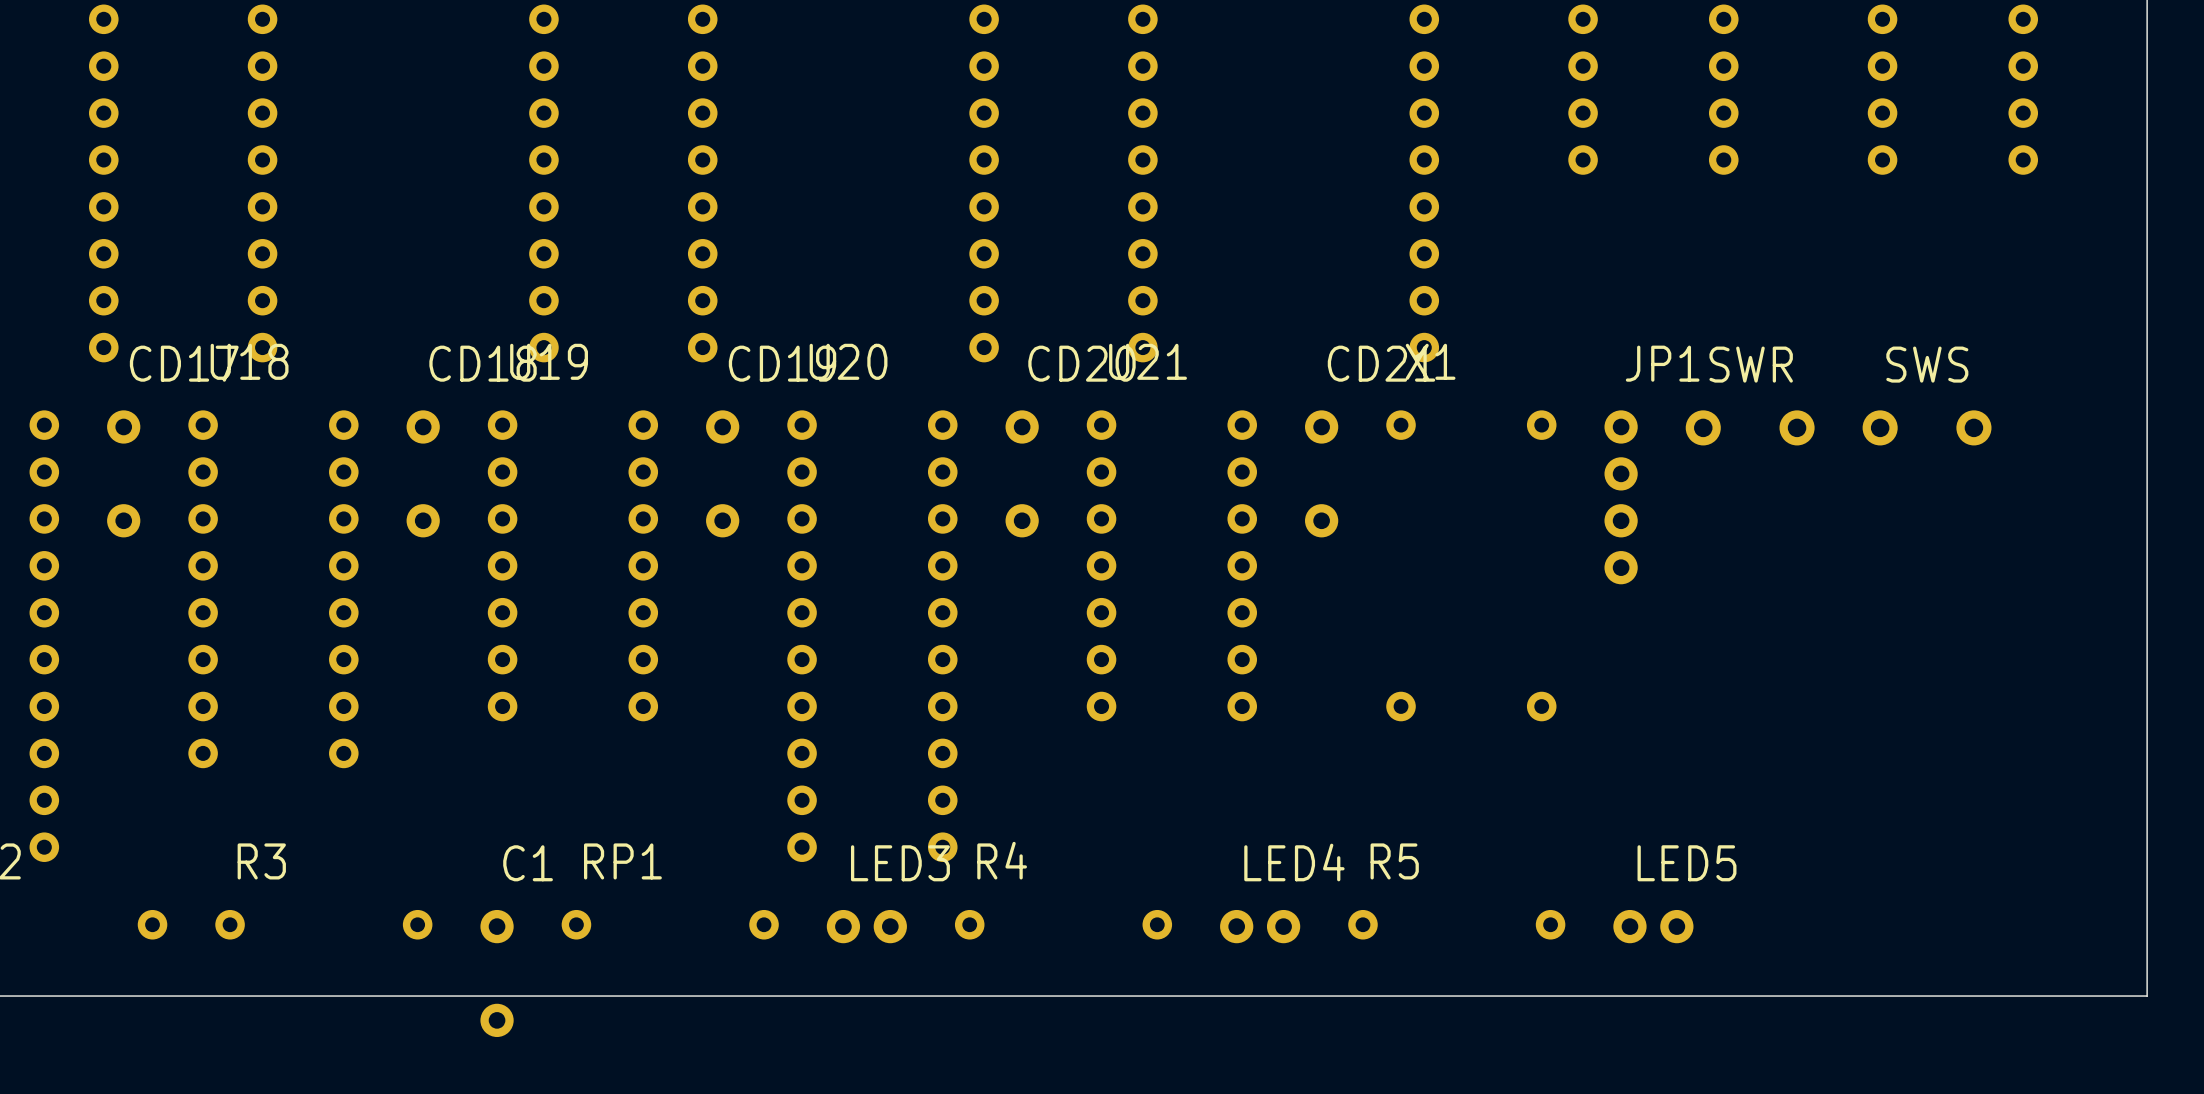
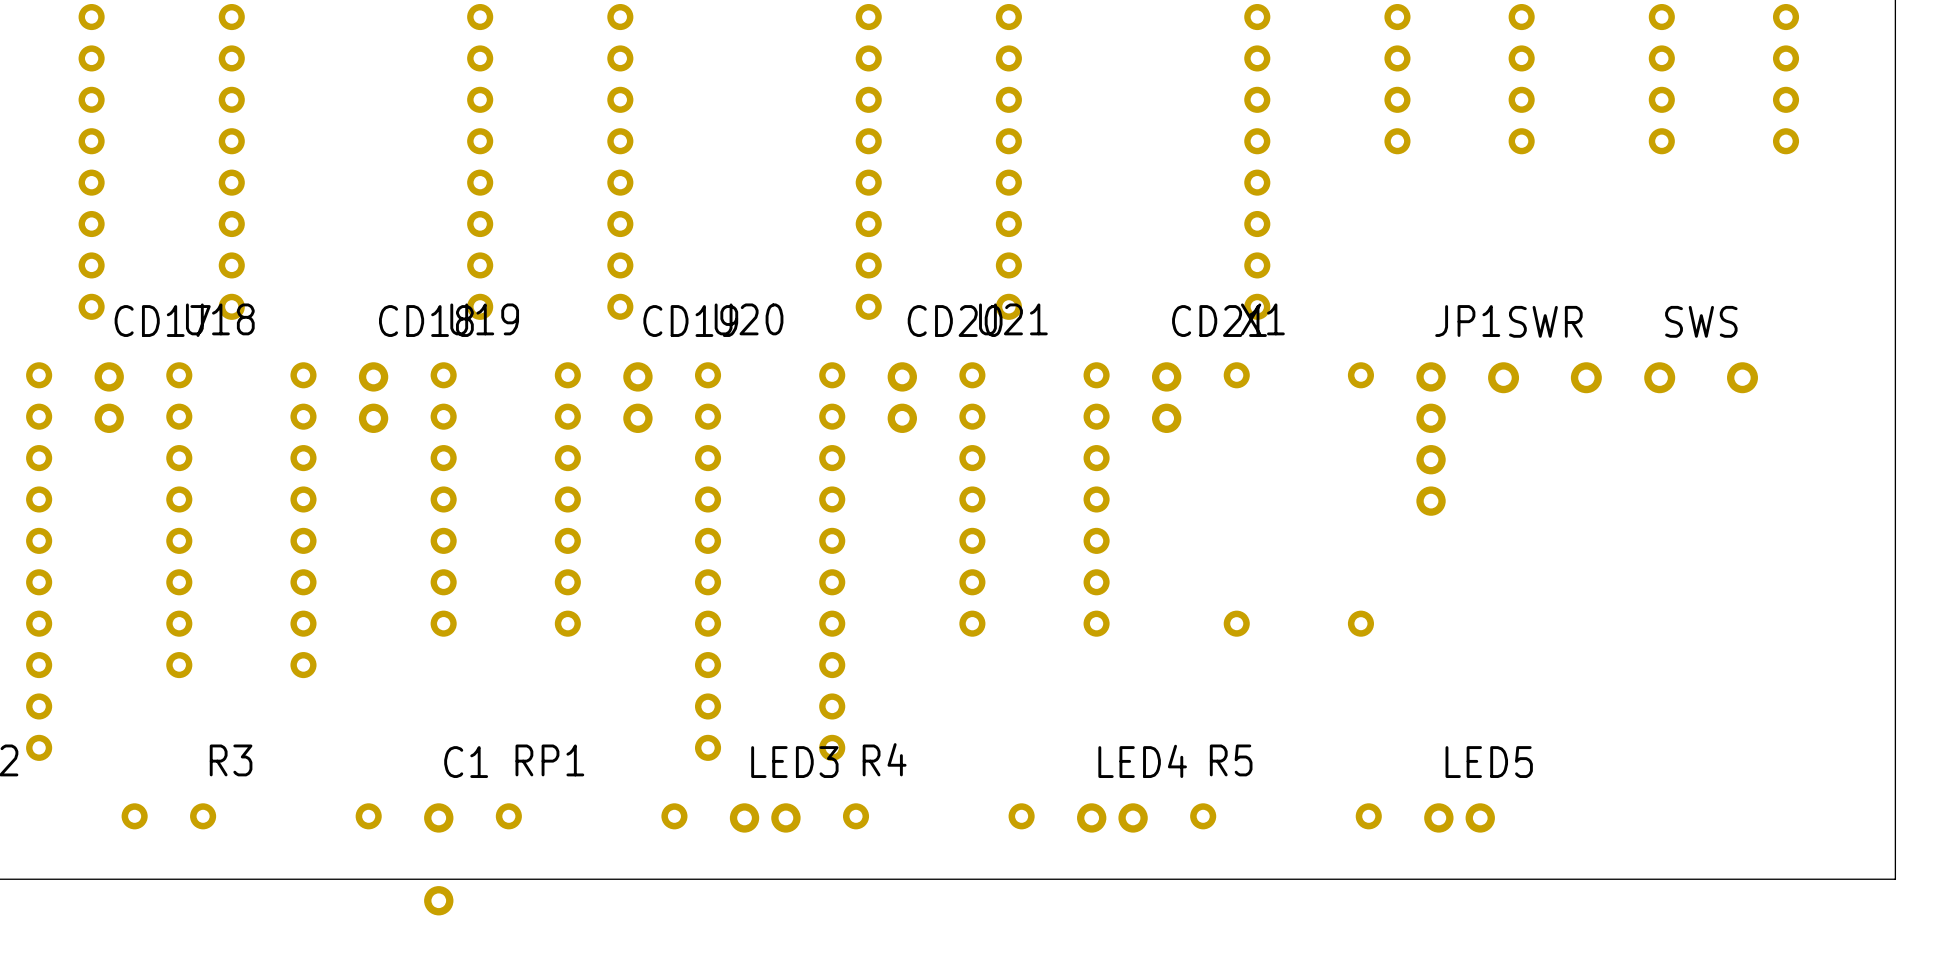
CD17 footprint: [107, 410, 141, 538] -> [94, 362, 124, 433]
CD18 footprint: [406, 410, 440, 538] -> [358, 362, 389, 433]
CD19 footprint: [706, 410, 740, 538] -> [623, 362, 653, 433]
CD20 footprint: [1005, 410, 1039, 538] -> [887, 362, 917, 433]
CD21 footprint: [1305, 410, 1339, 538] -> [1152, 362, 1182, 433]

